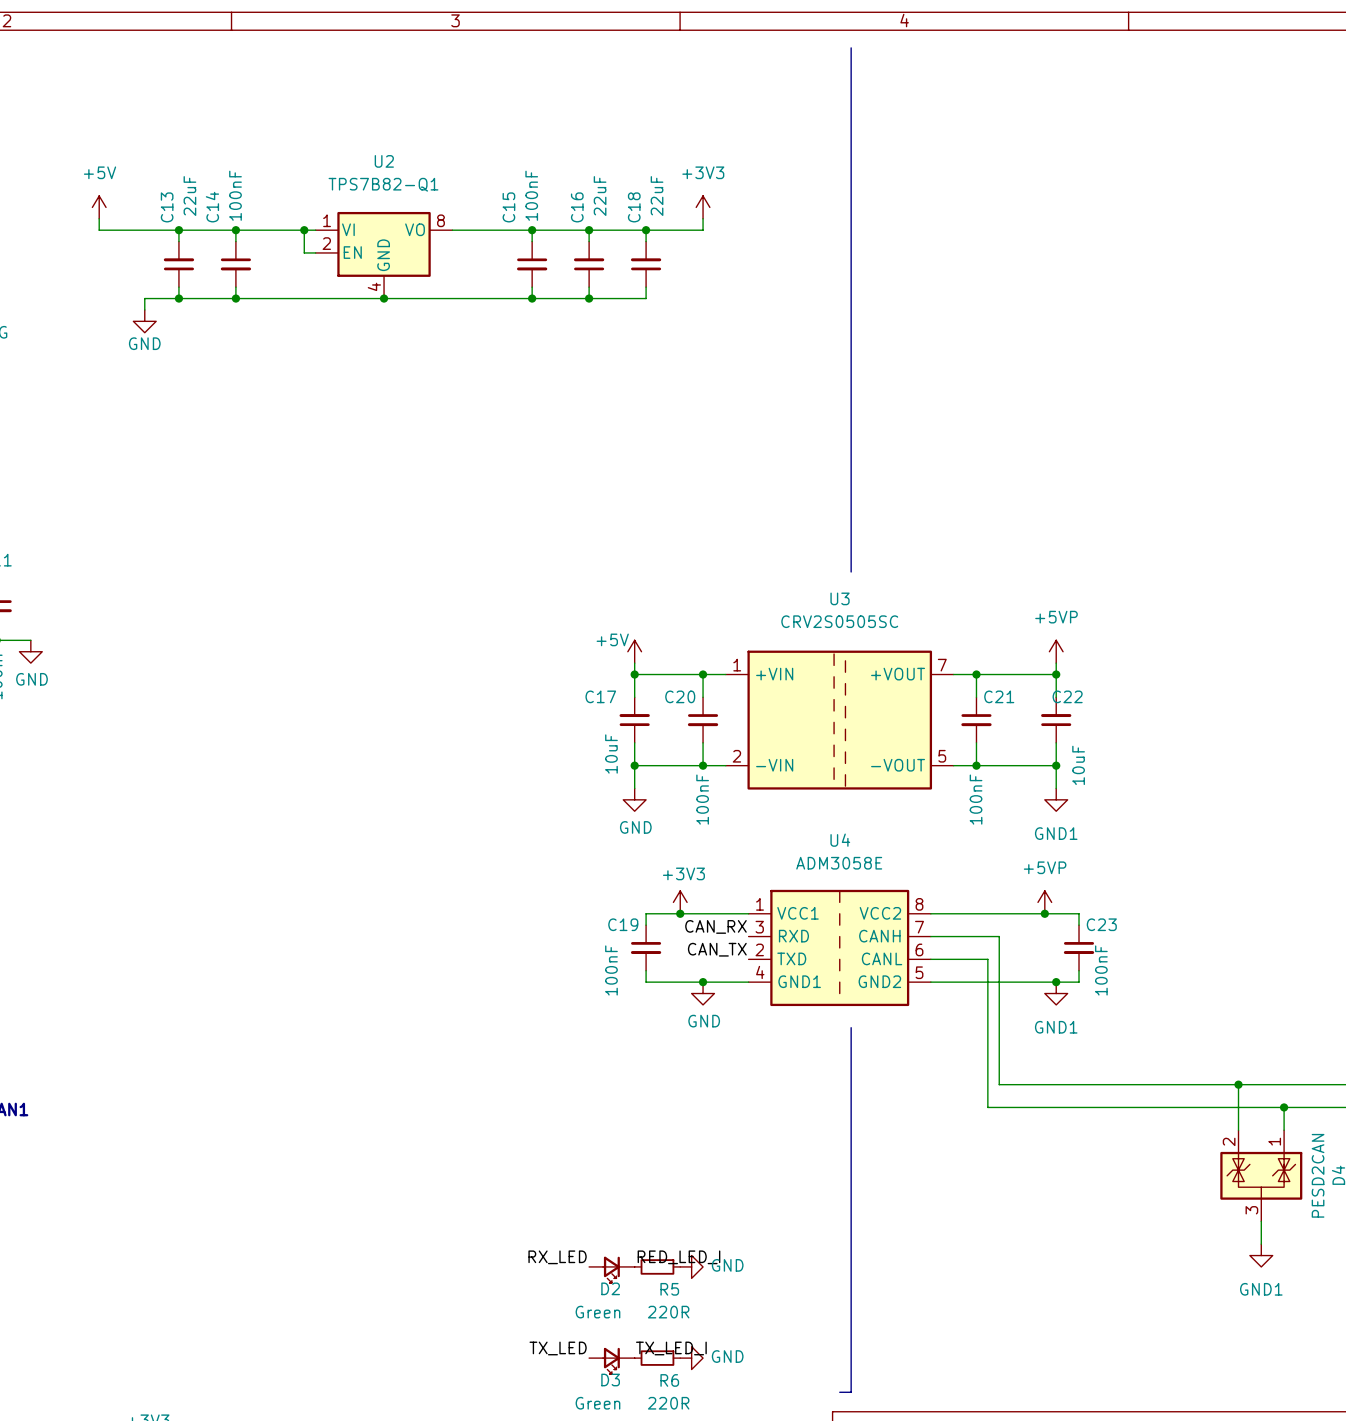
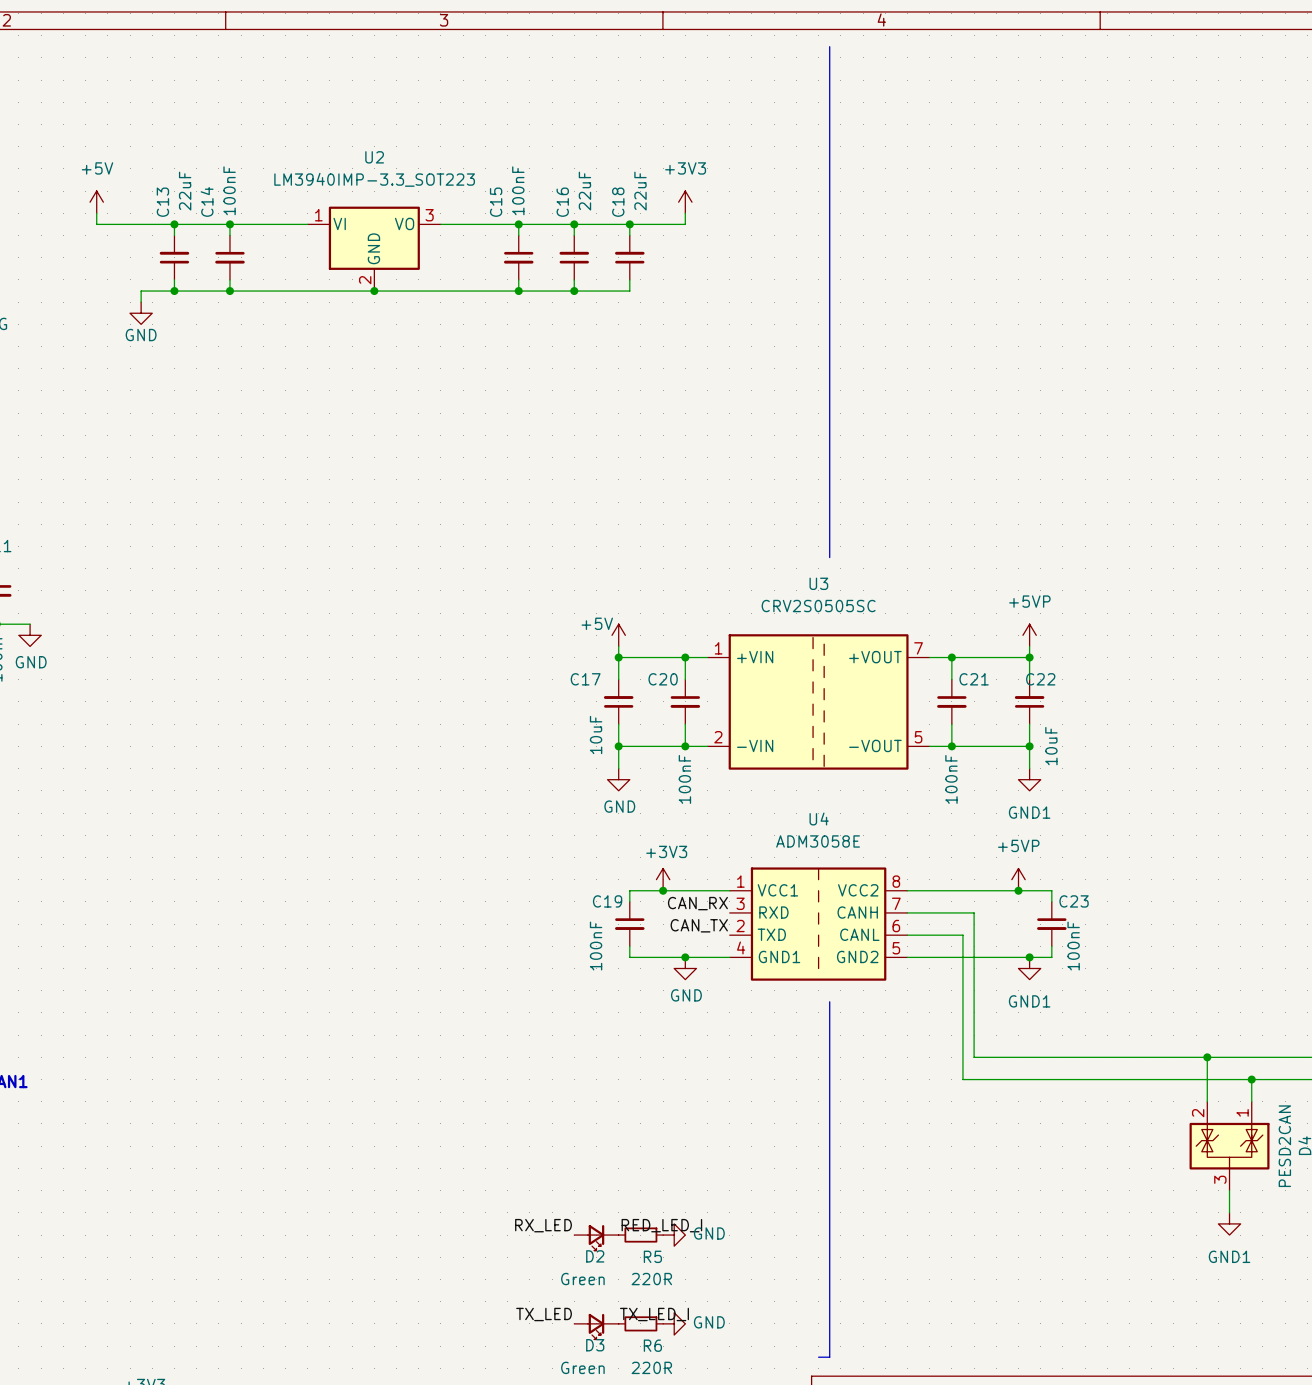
U2 value: TPS7B82-Q1 (383, 184) -> LM3940IMP-3.3_SOT223 (374, 179)
U2 symbol: [315, 211, 453, 299] -> [307, 206, 441, 292]
wire: (304, 230) (304, 252) (315, 252) -> none
junction: (304, 230) -> none

